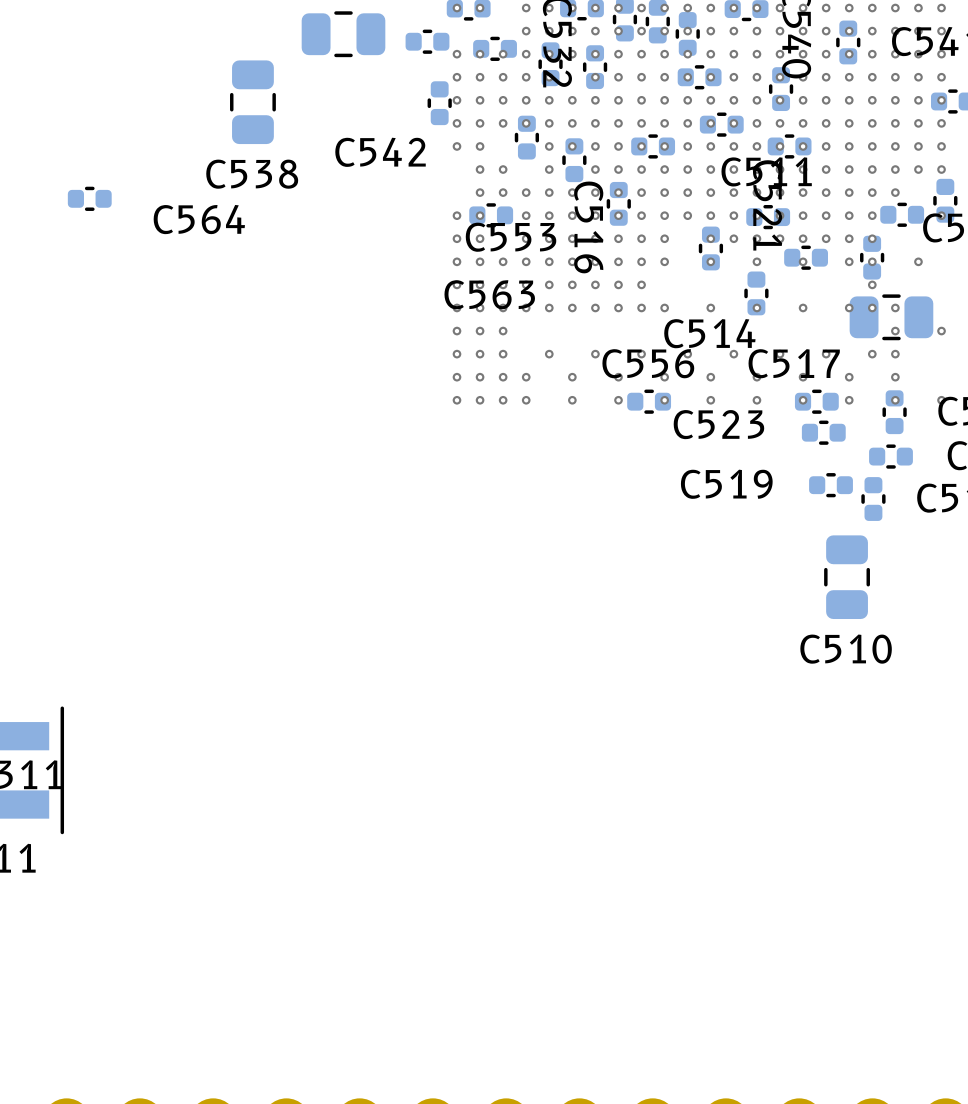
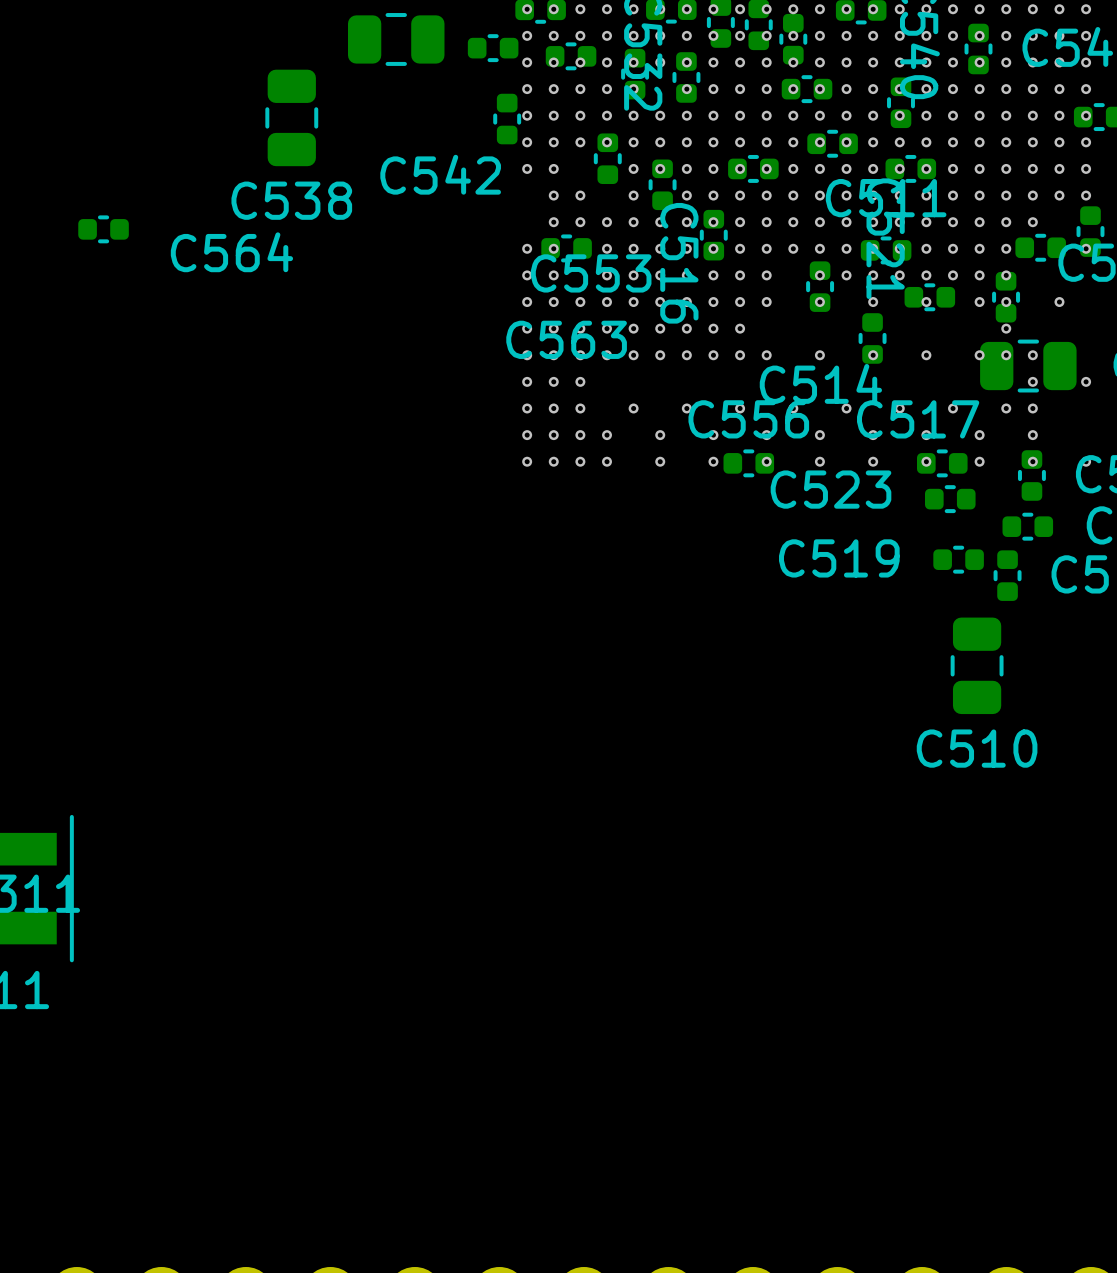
via: none -> (580, 9)
via: none -> (527, 35)
via: none -> (553, 35)
via: none -> (580, 35)

